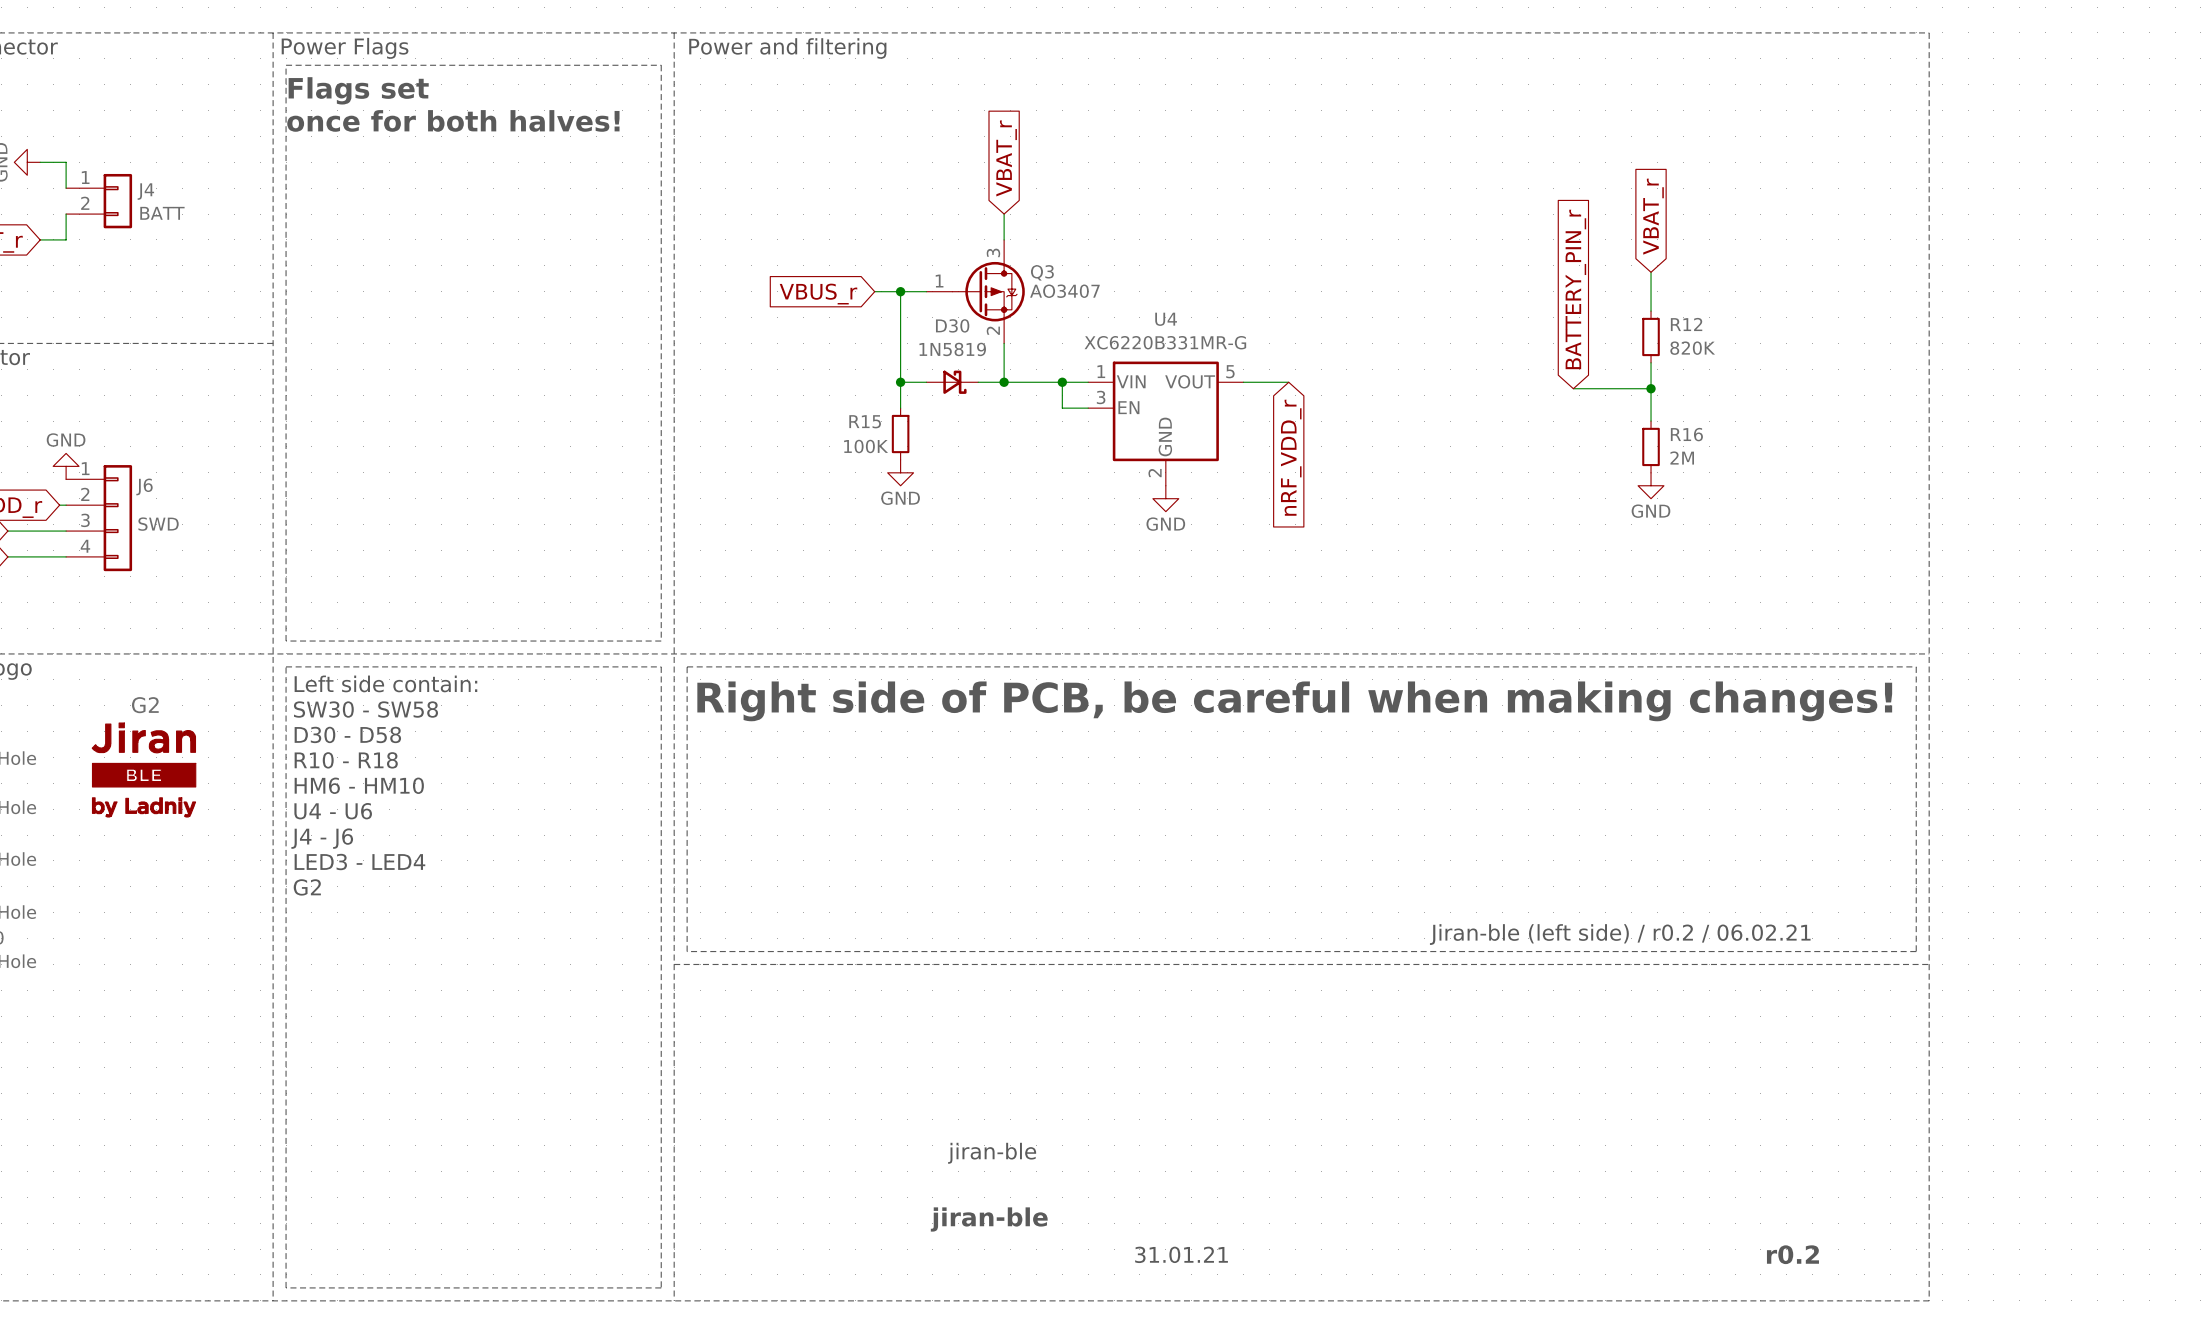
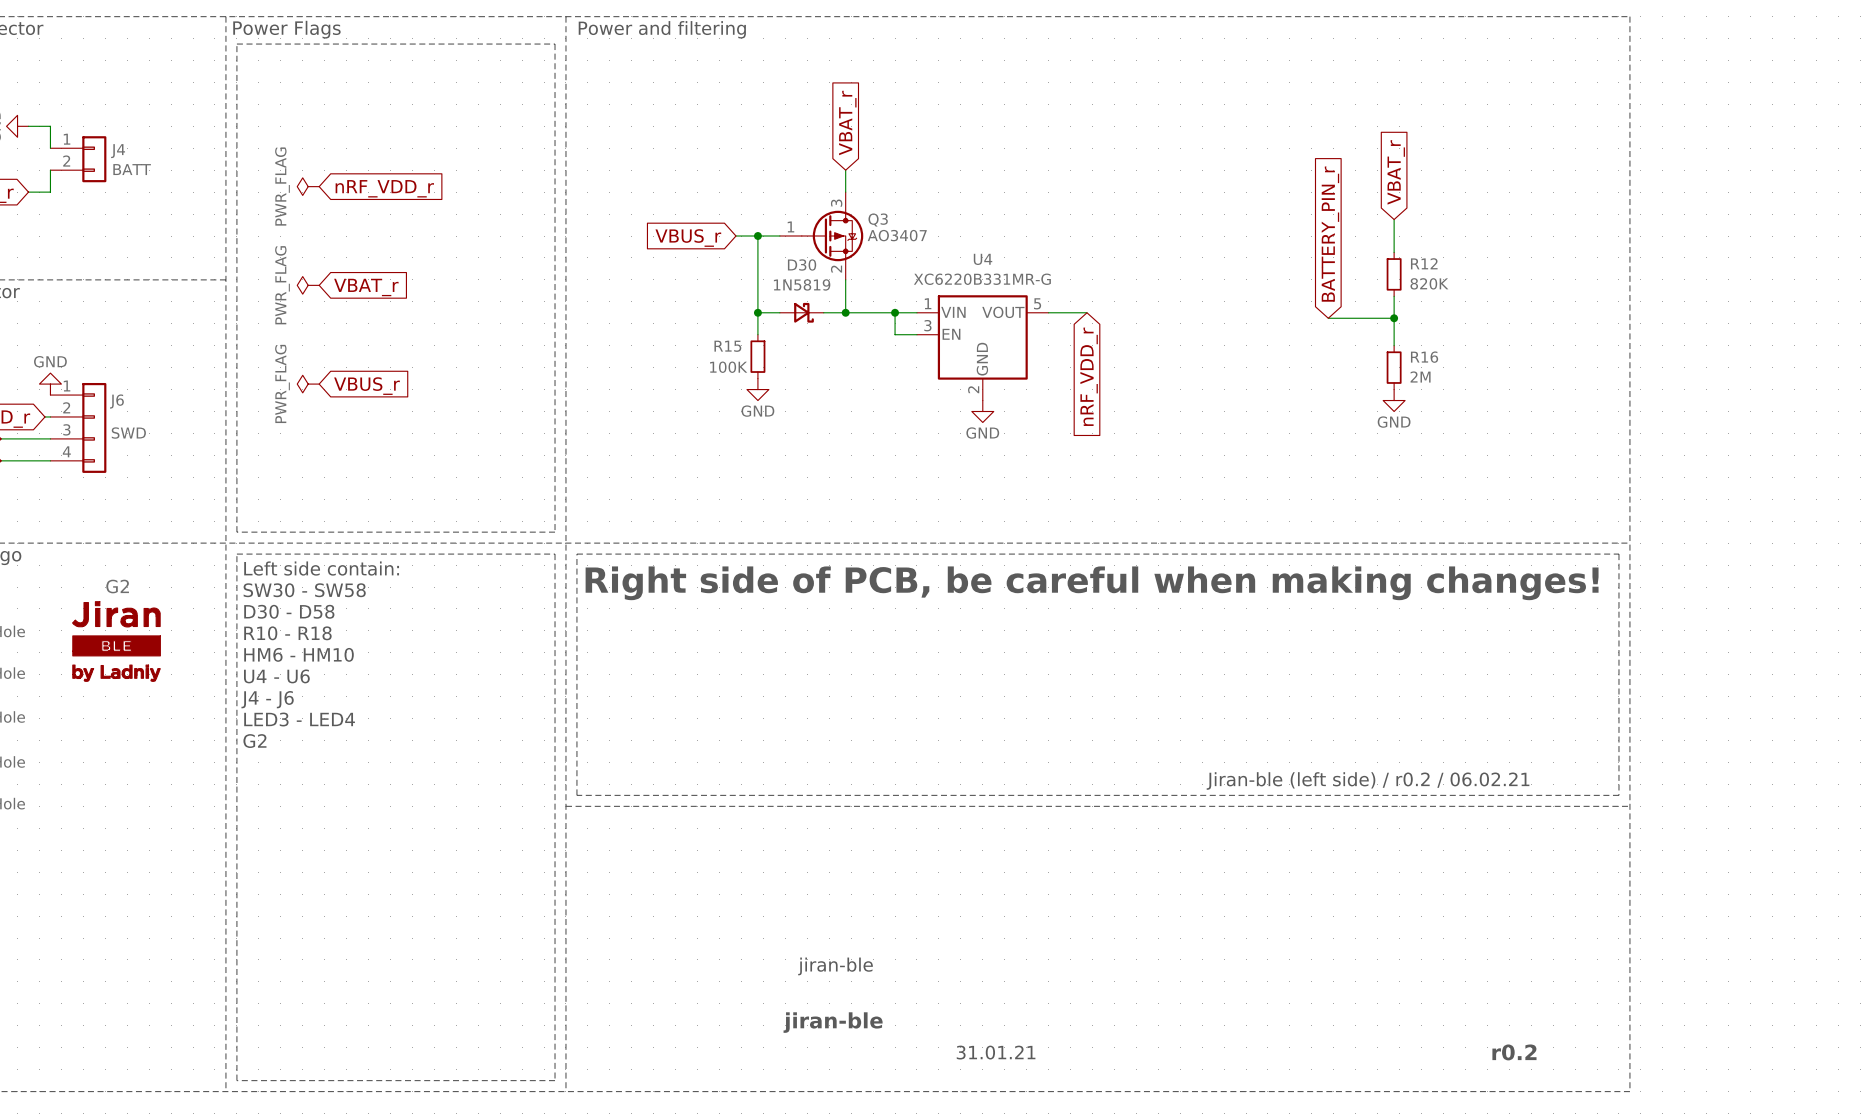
text: Flags set (358, 90) -> none
text: once for both halves! (453, 120) -> none
power symbol: none -> PWR_FLAG (308, 186)
global label: none -> nRF_VDD_r (384, 188)
power symbol: none -> PWR_FLAG (308, 285)
global label: none -> VBAT_r (366, 287)
power symbol: none -> PWR_FLAG (308, 384)
global label: none -> VBUS_r (366, 386)

